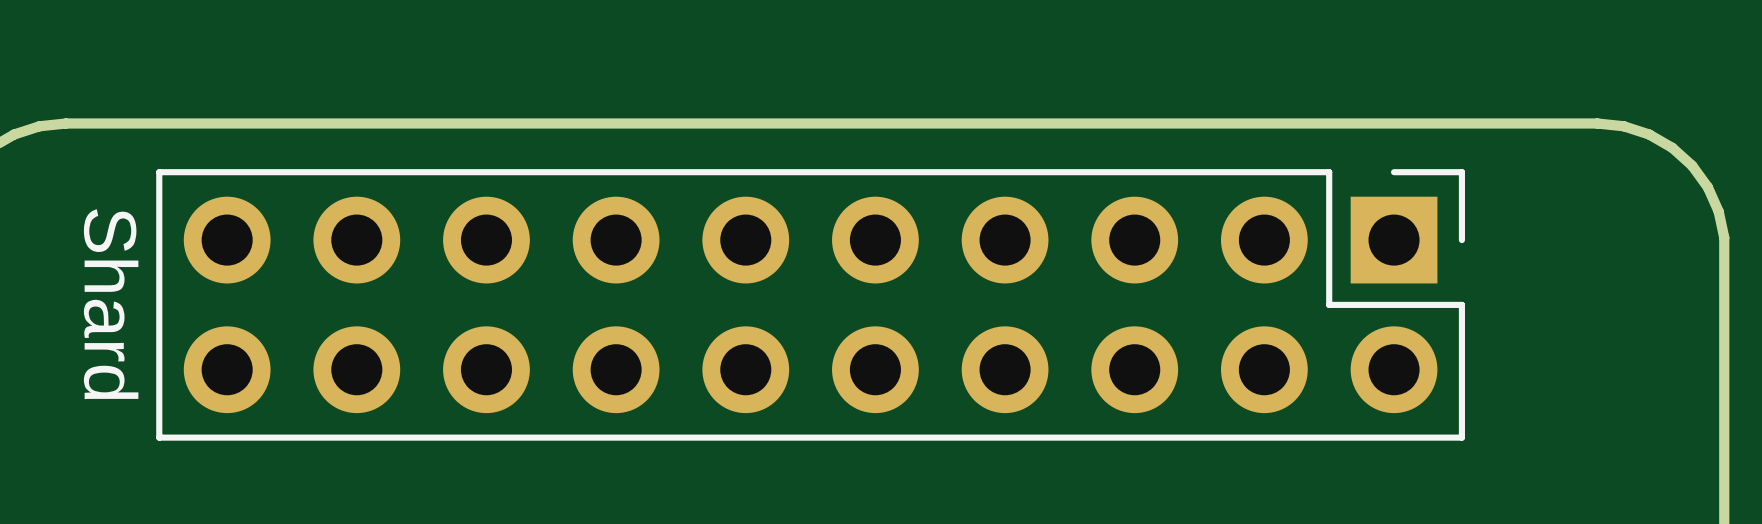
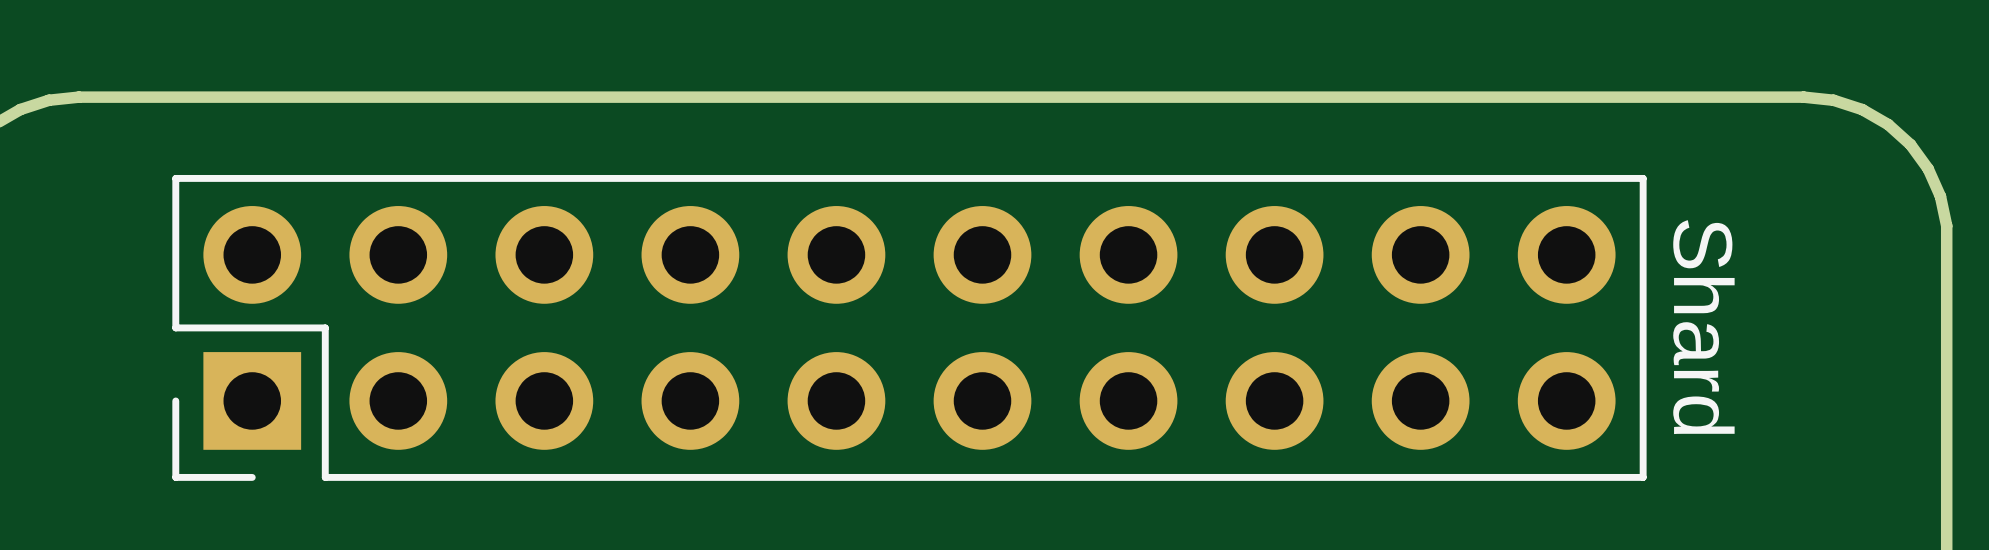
part rotation: 0° (810, 304) -> 180° (909, 327)

